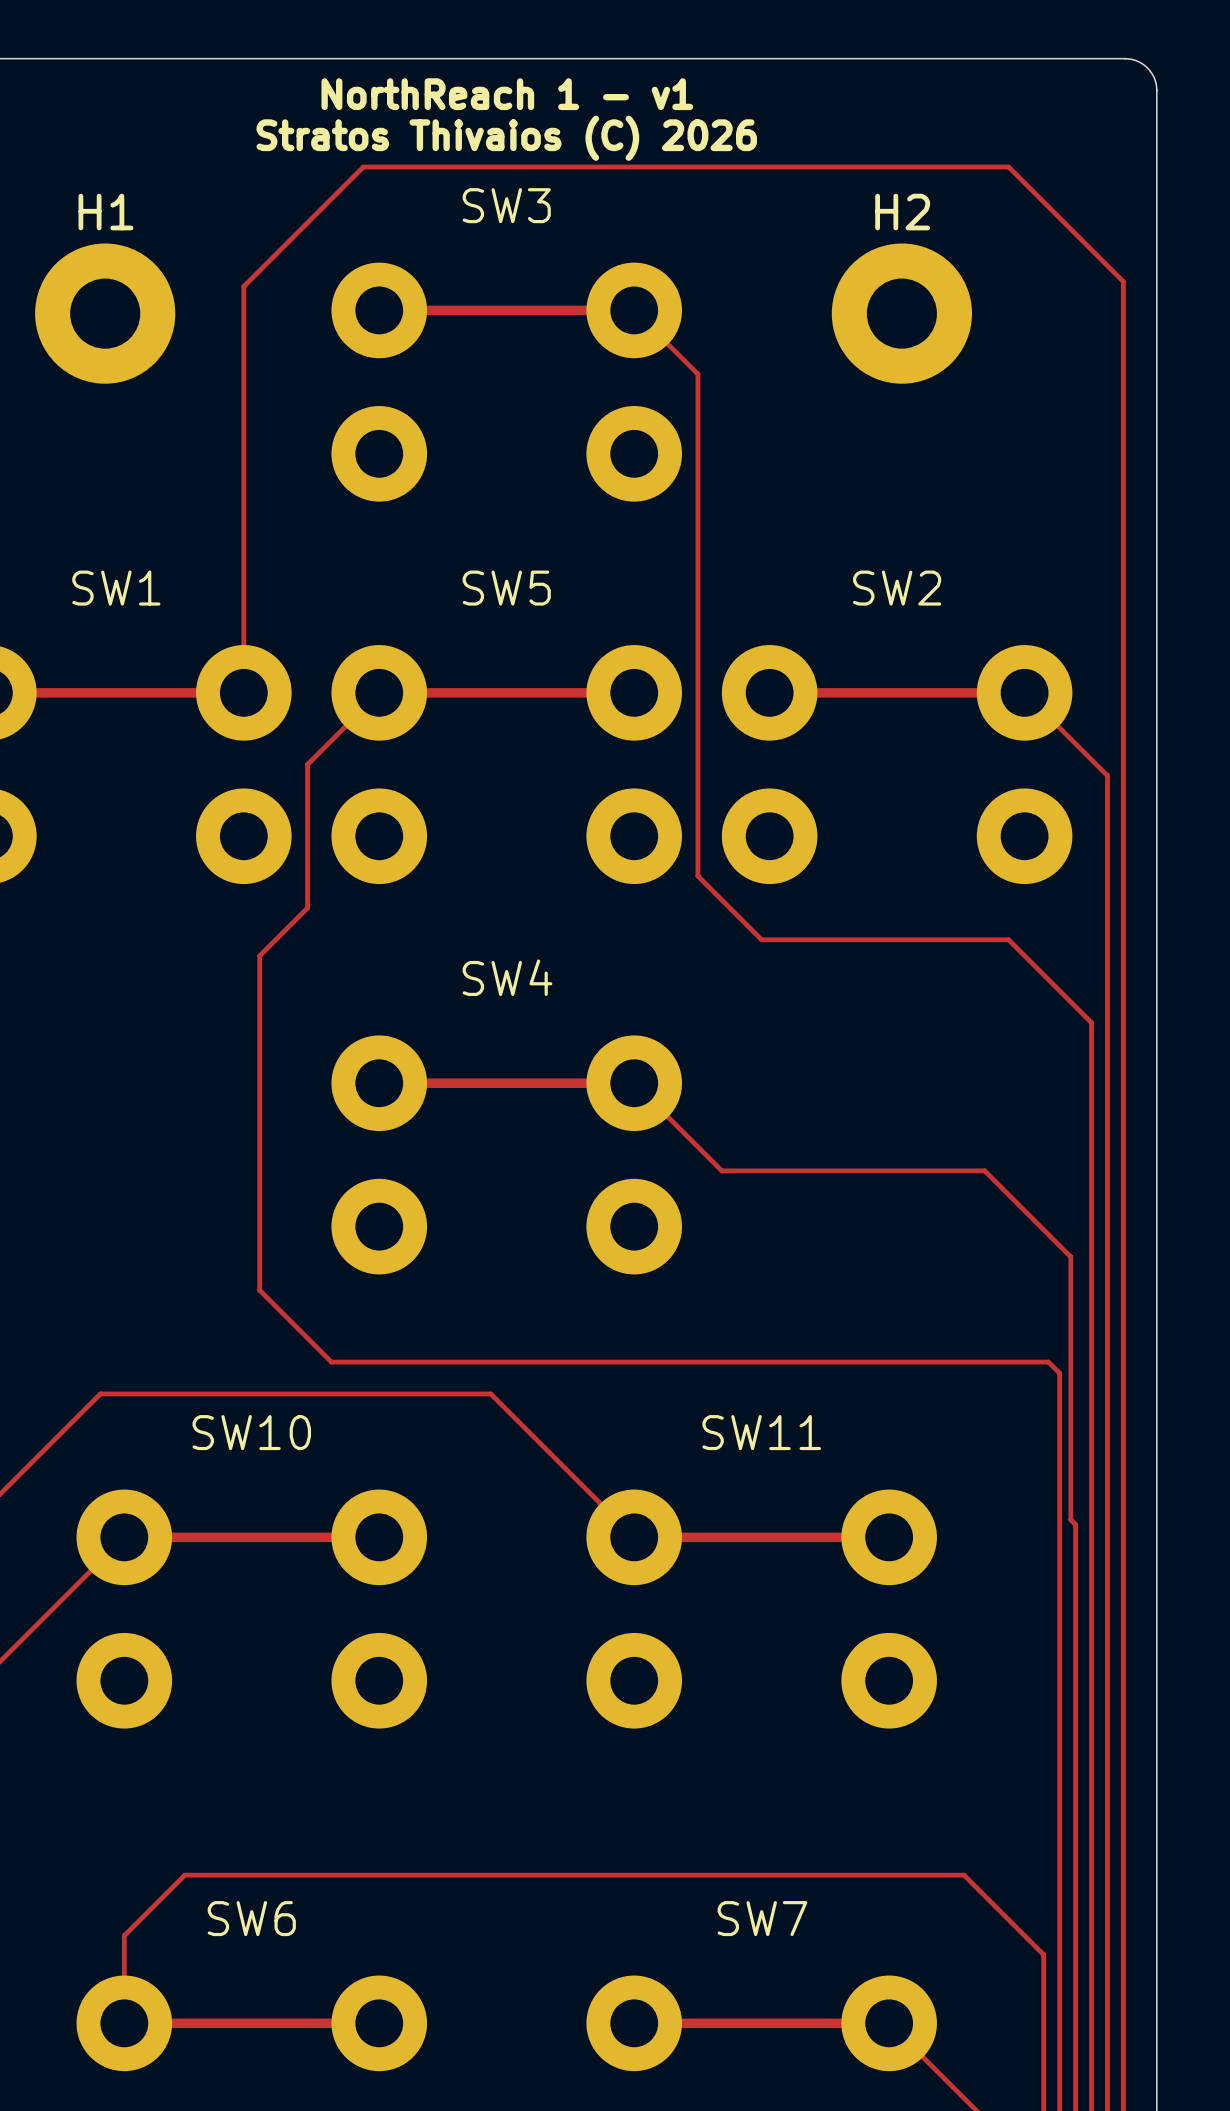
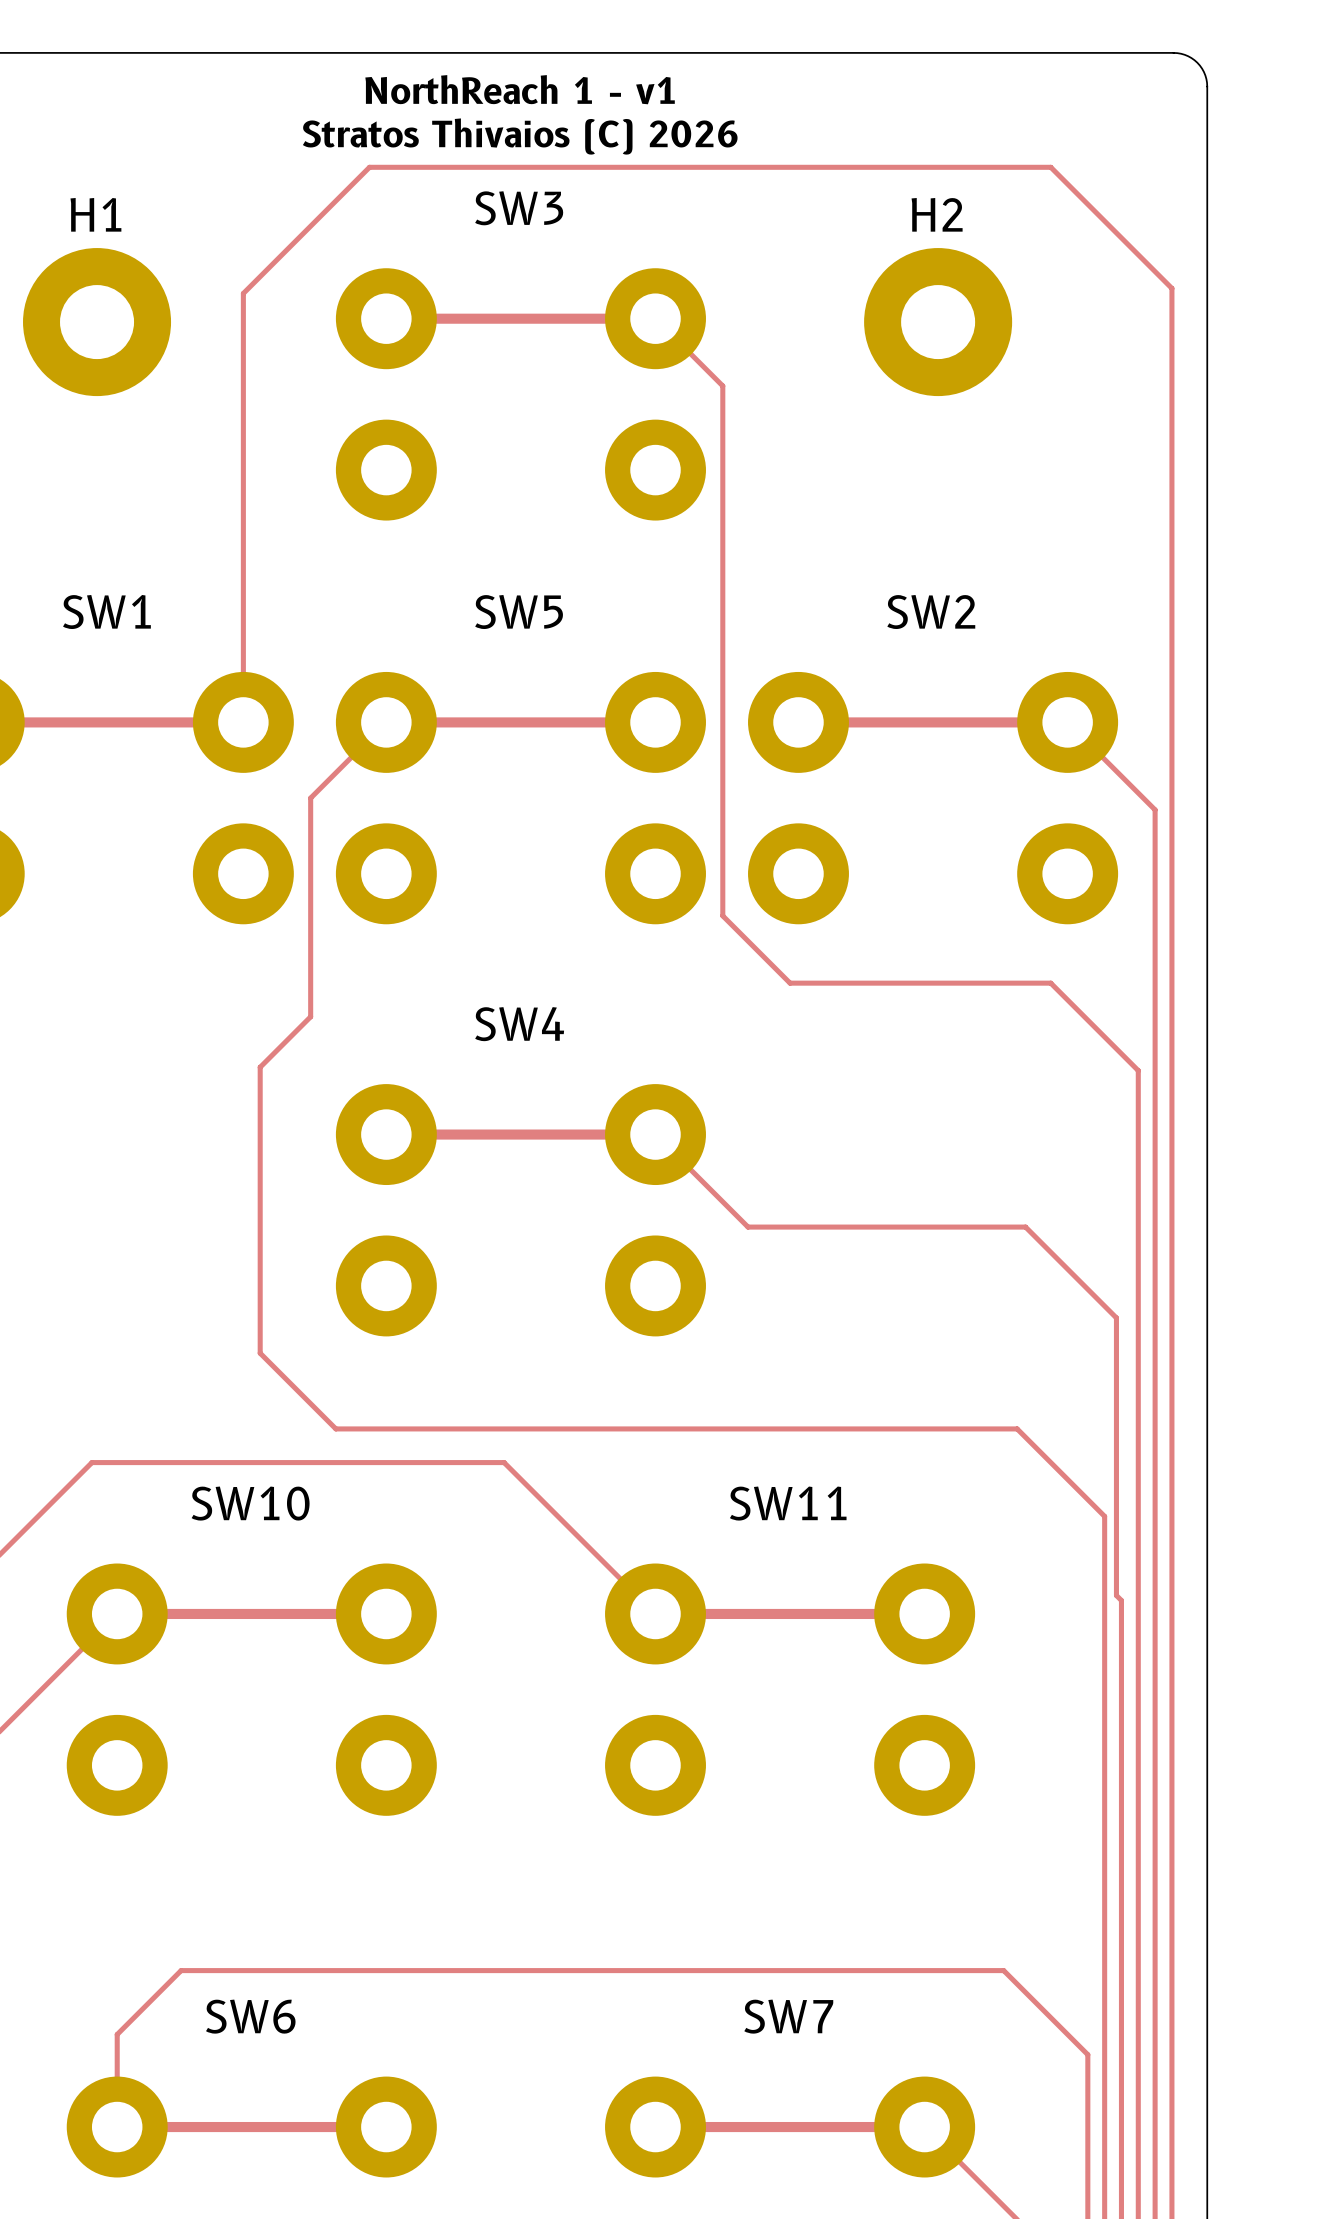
track: (307, 907) (259, 955) (259, 1019) -> (310, 949) (310, 1016) (260, 1067)
track: (976, 1362) (1048, 1362) (1059, 1373) (1059, 1444) -> (1017, 1428) (1104, 1516)

